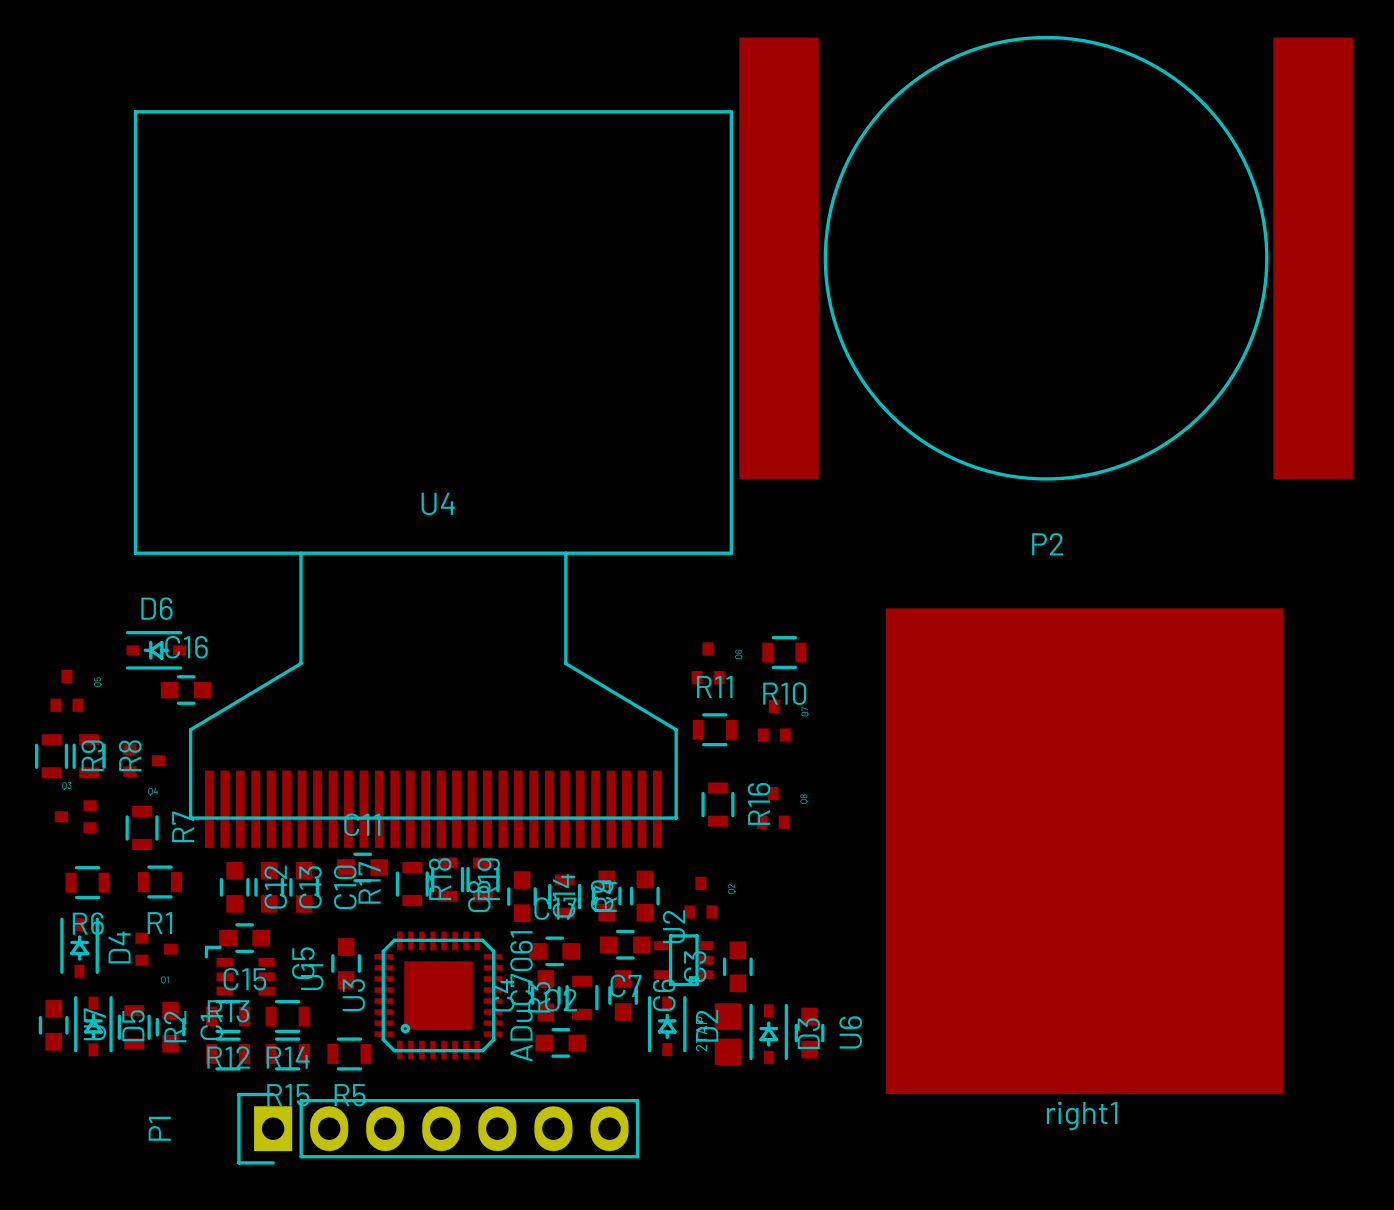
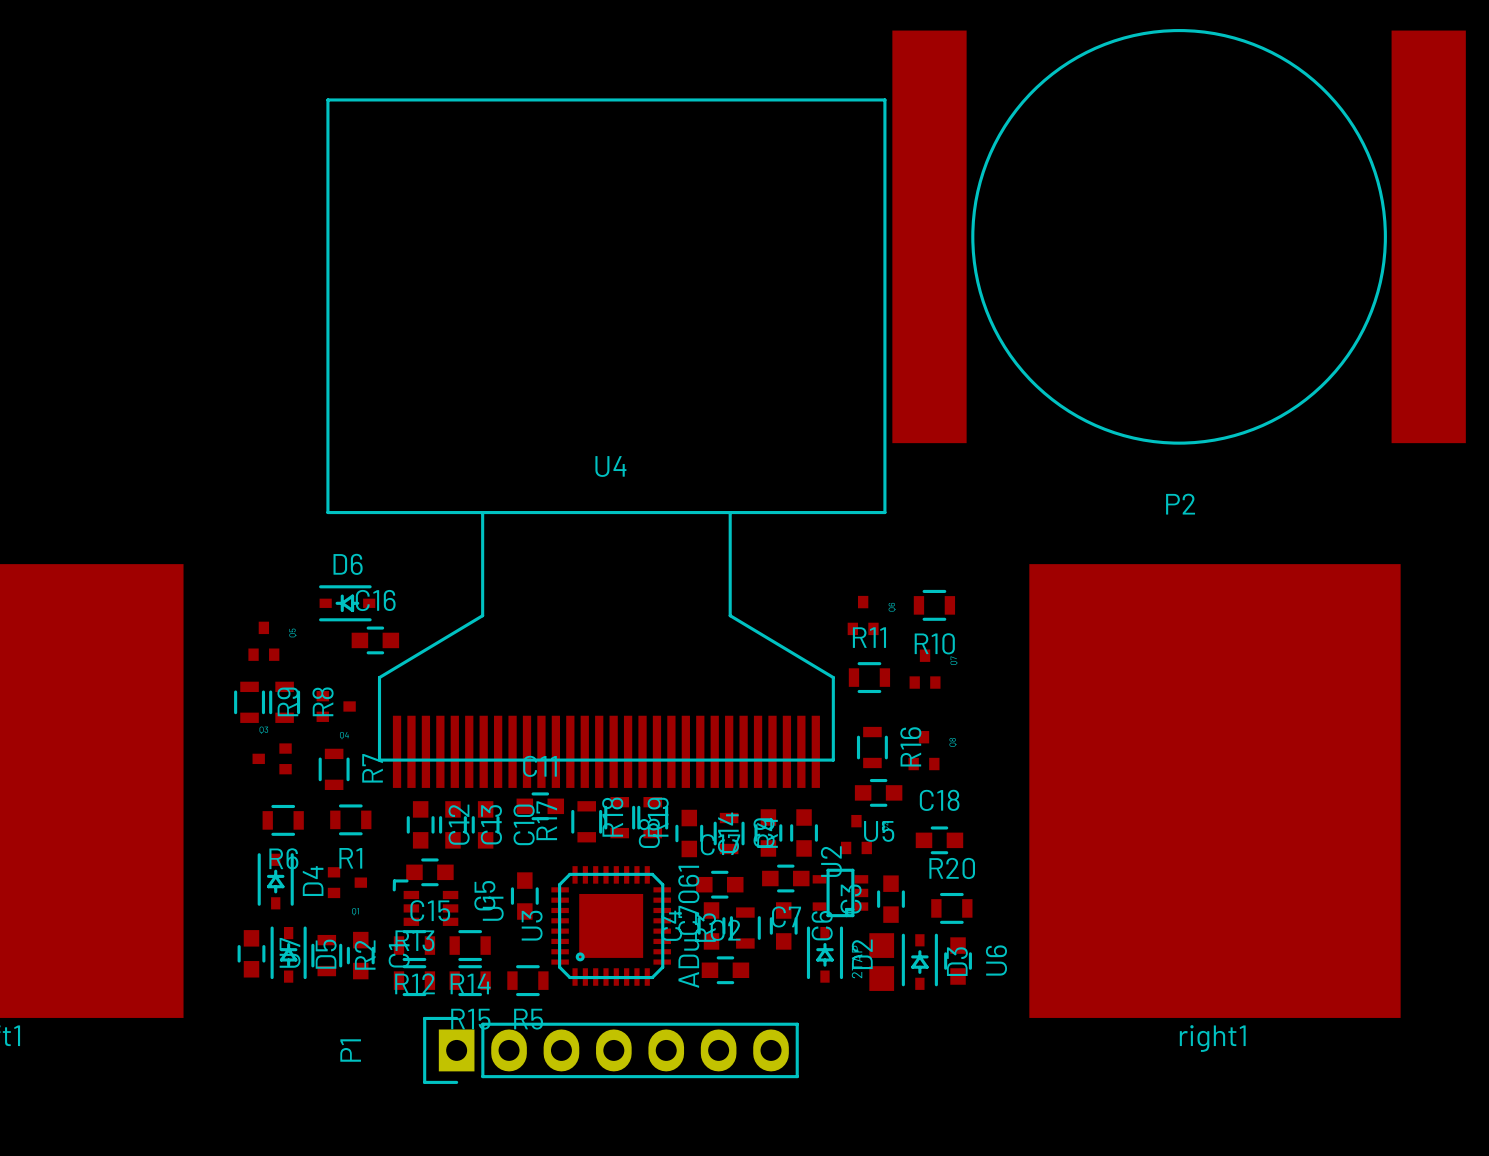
U5: none -> (878, 792)
C18: none -> (939, 840)
R20: none -> (951, 908)

